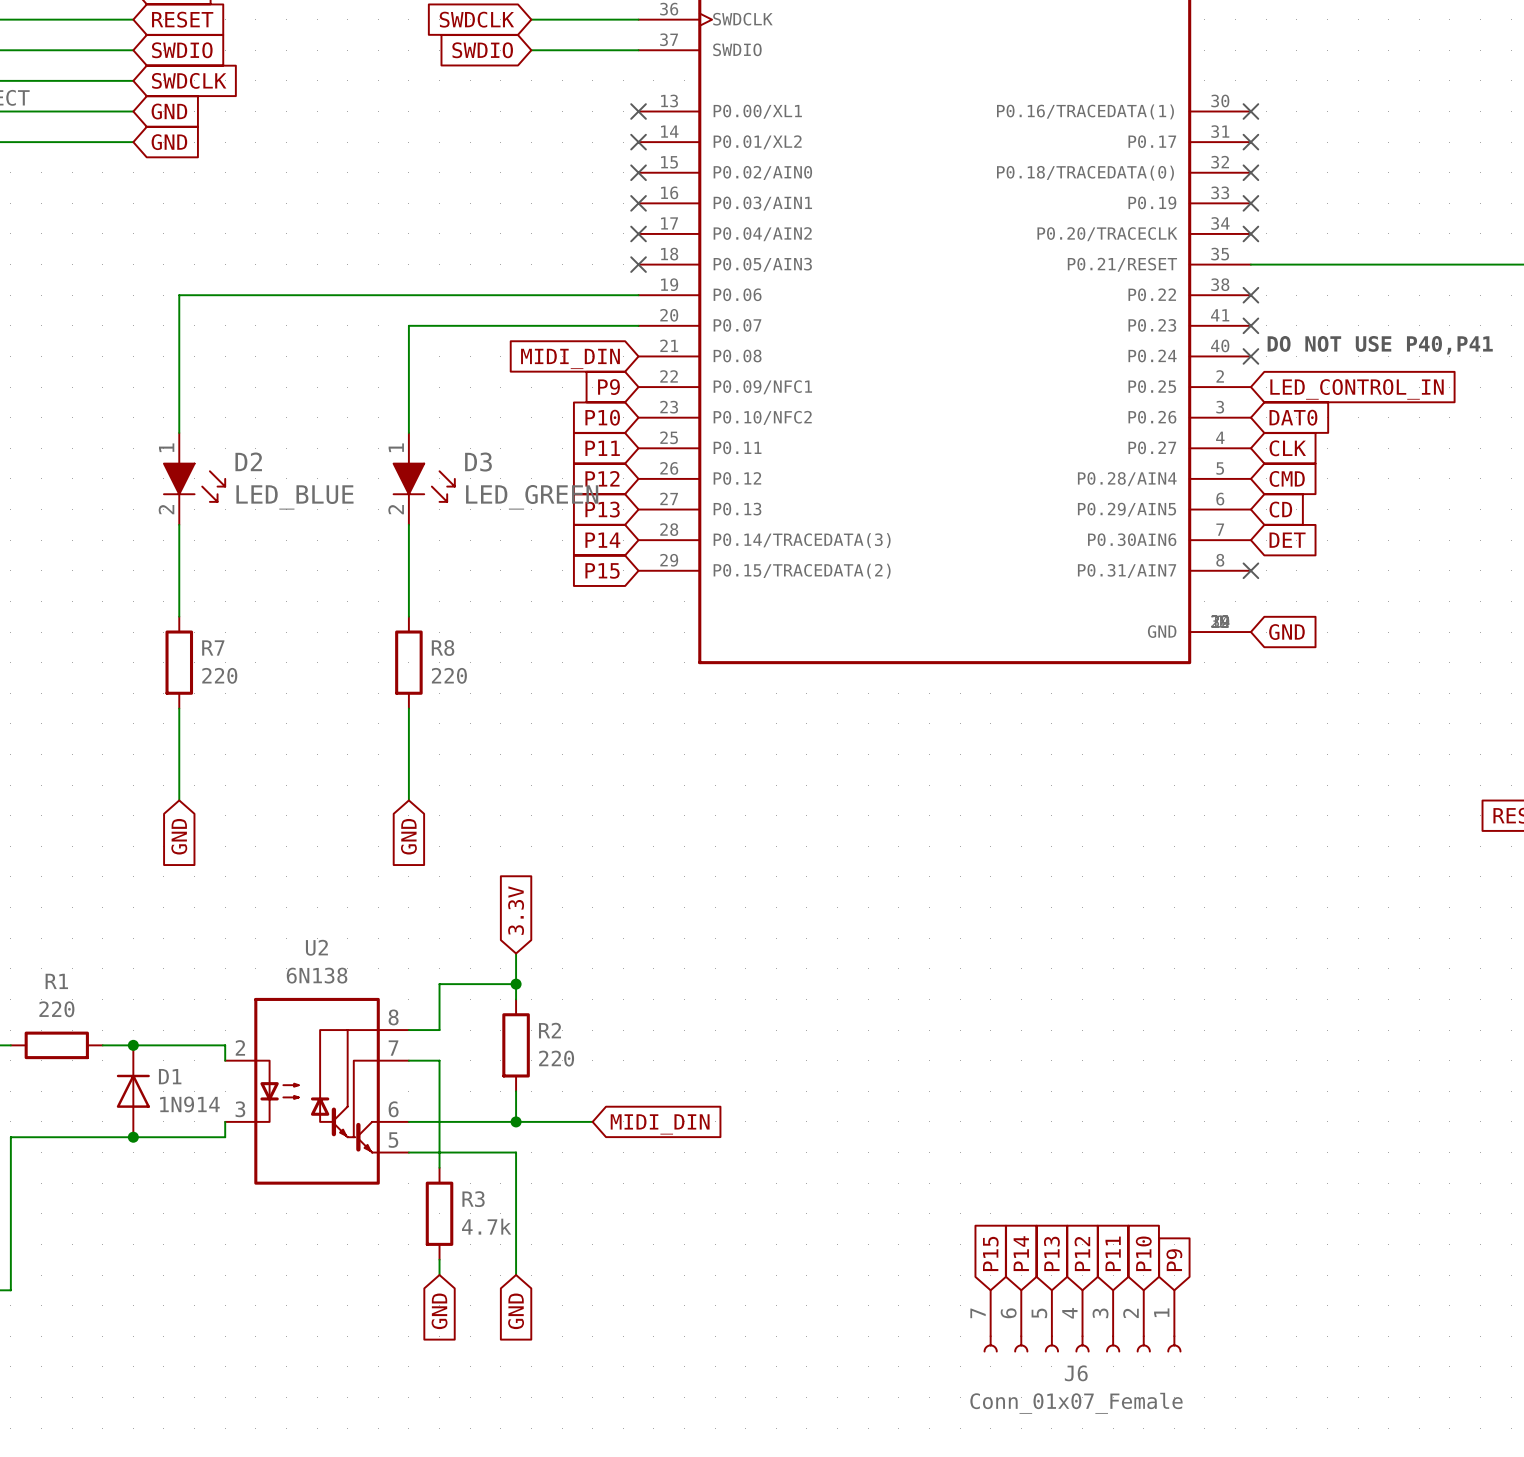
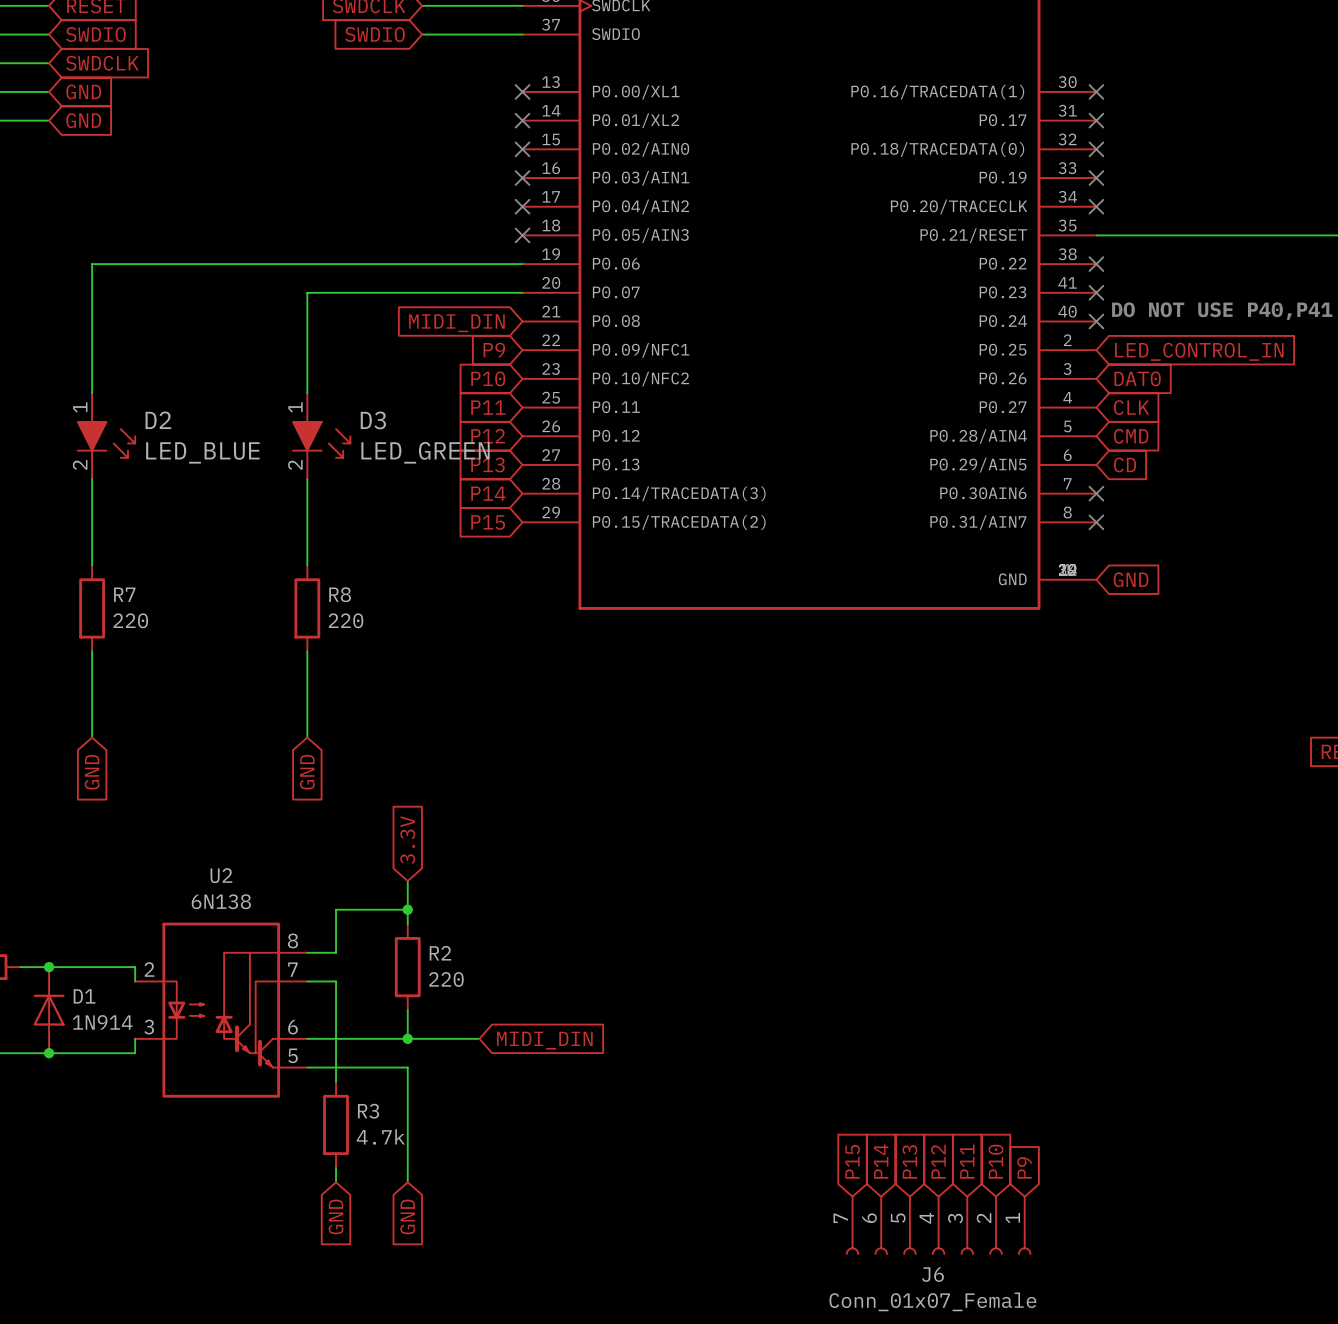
no-connect mark: none -> (1096, 493)
global label: DET (1287, 540) -> none

